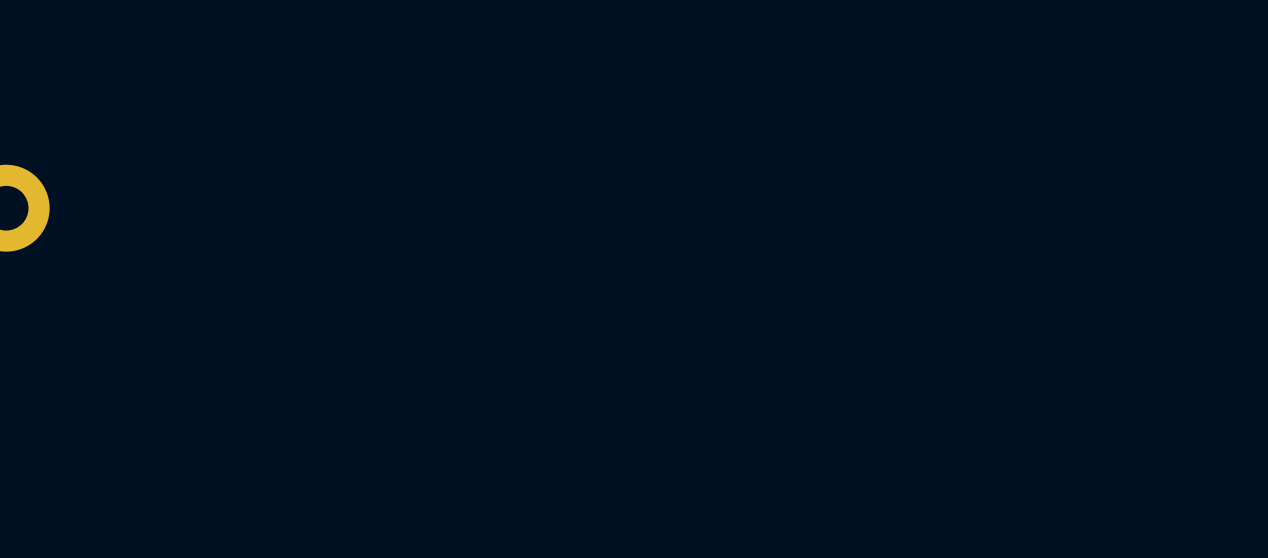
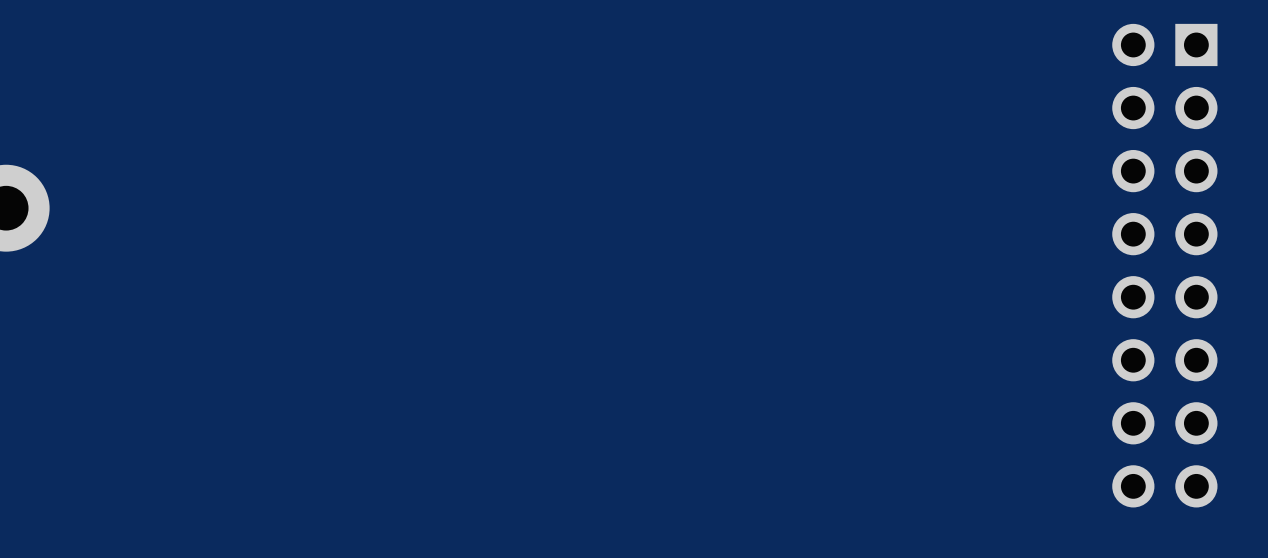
part: none -> (1164, 265)

